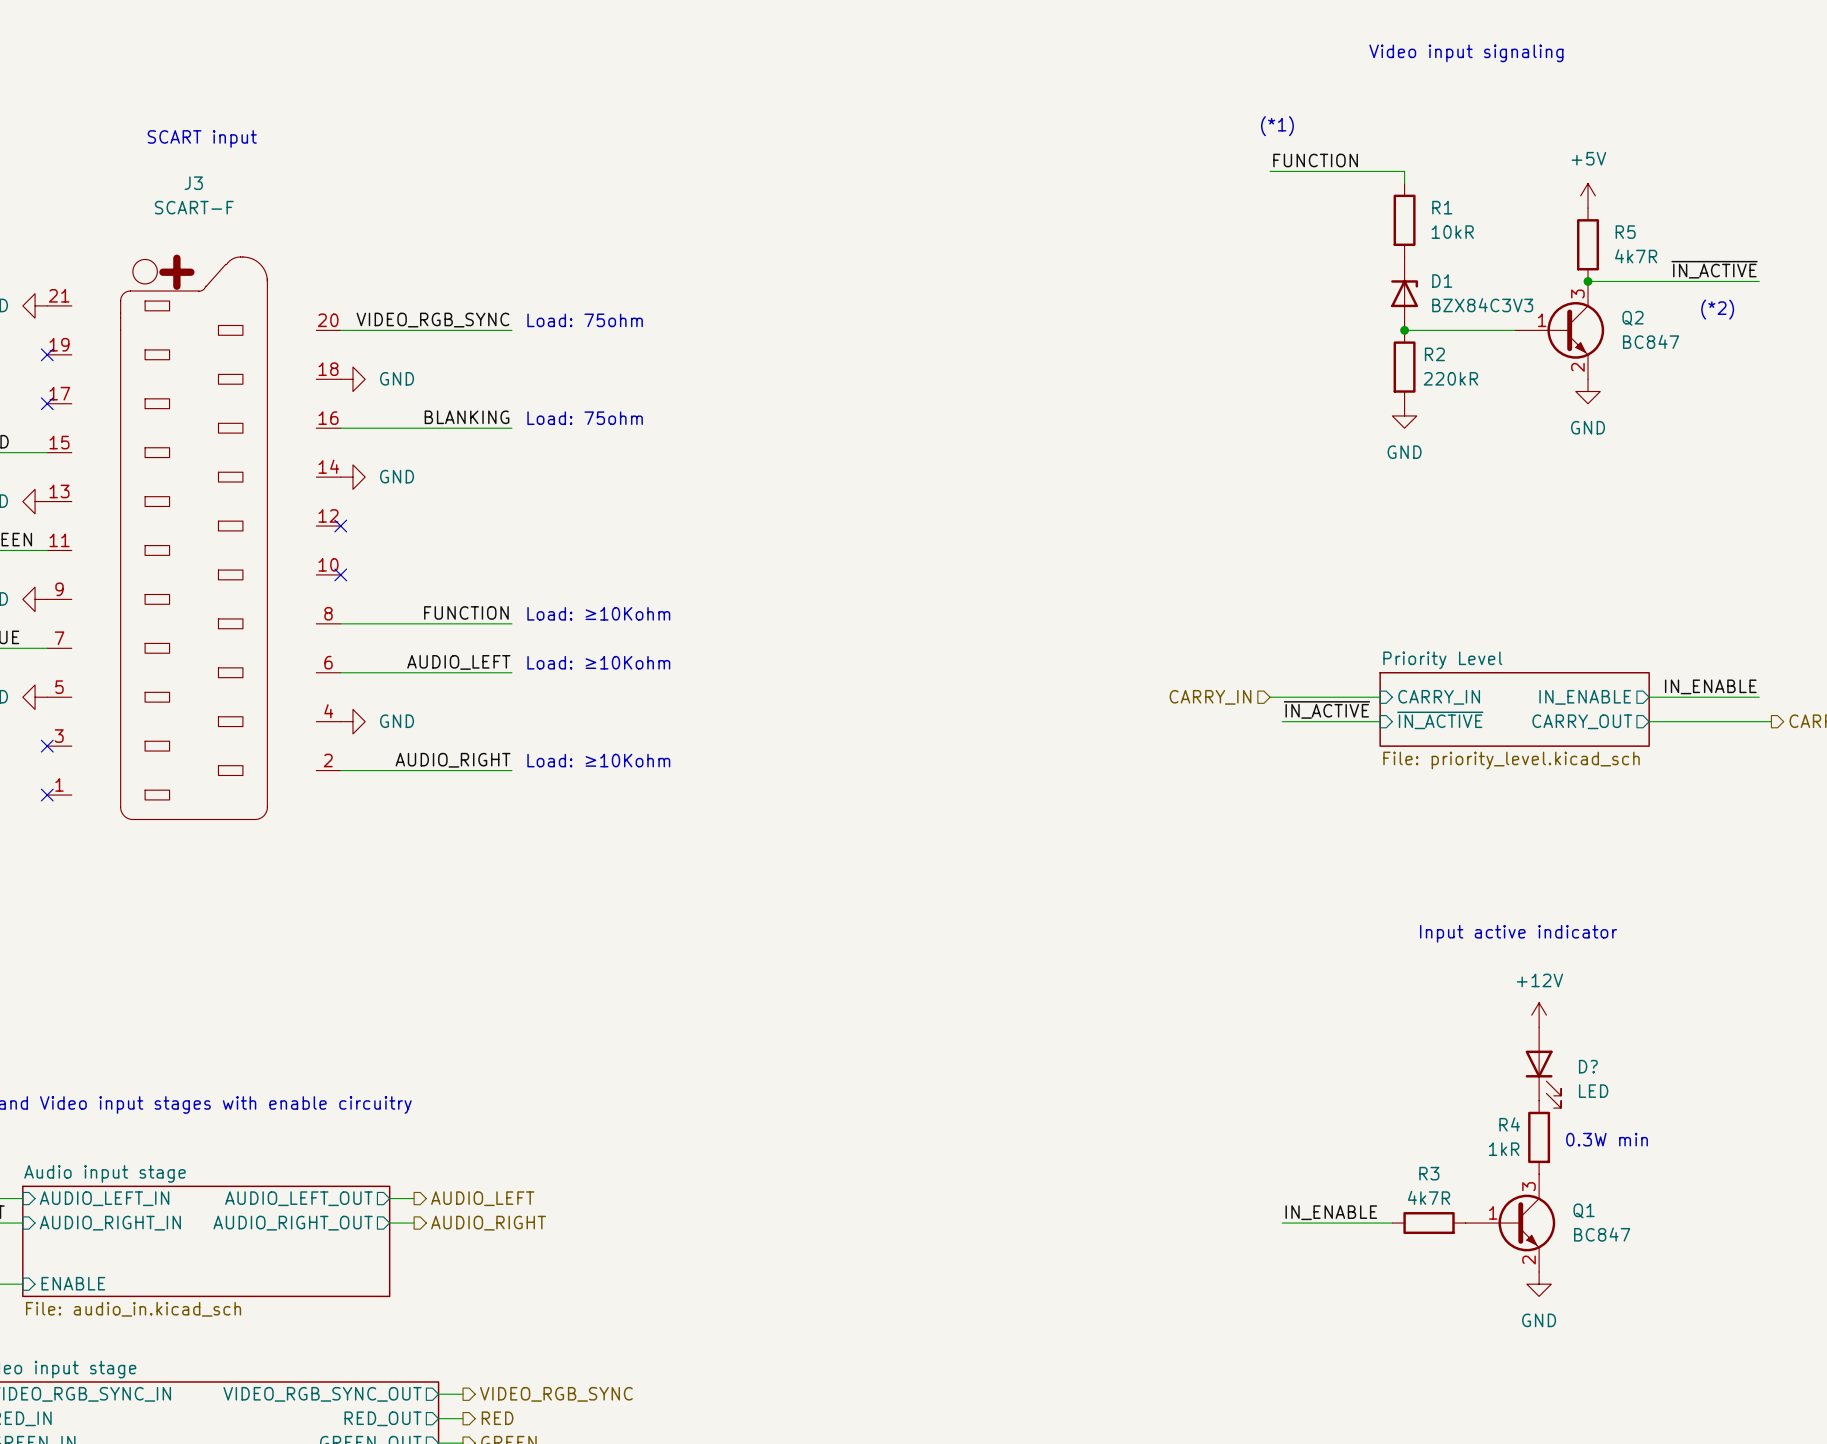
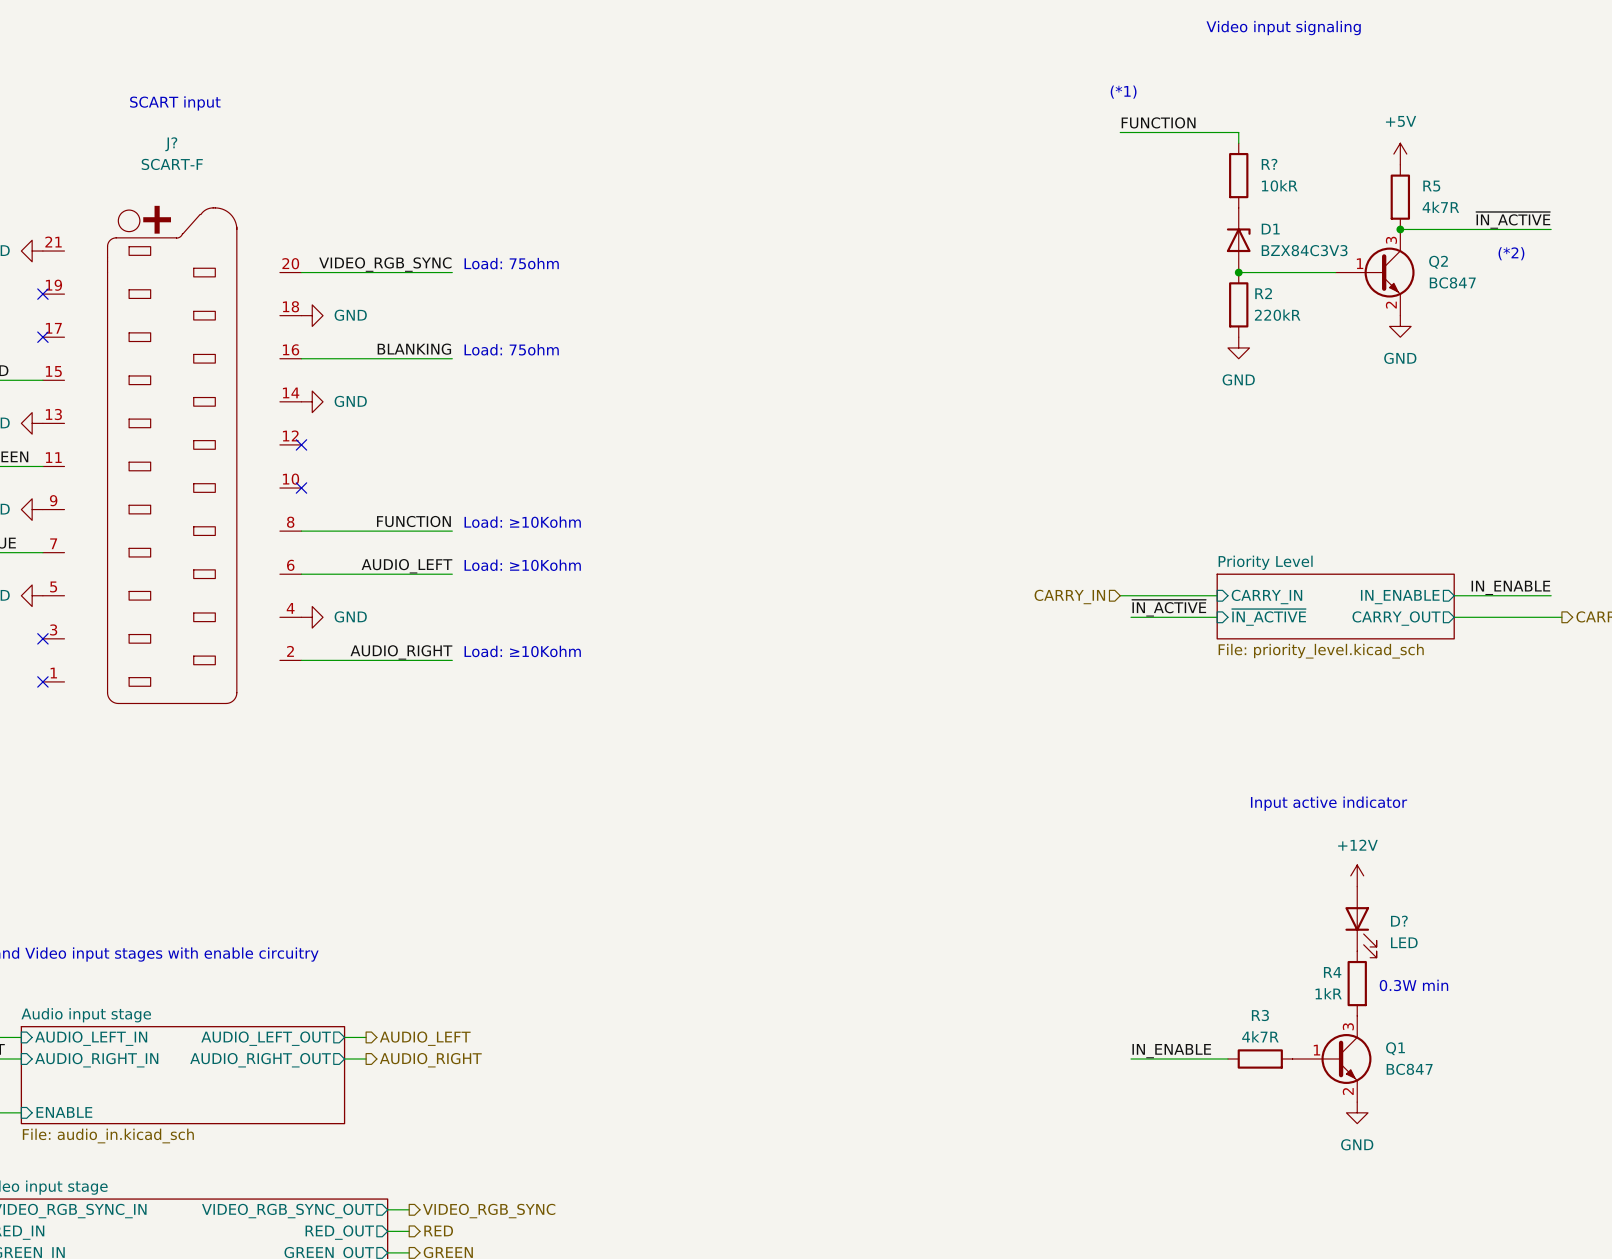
J3 name: J3 (193, 183) -> J? (171, 144)
R1 name: R1 (1442, 207) -> R? (1269, 164)

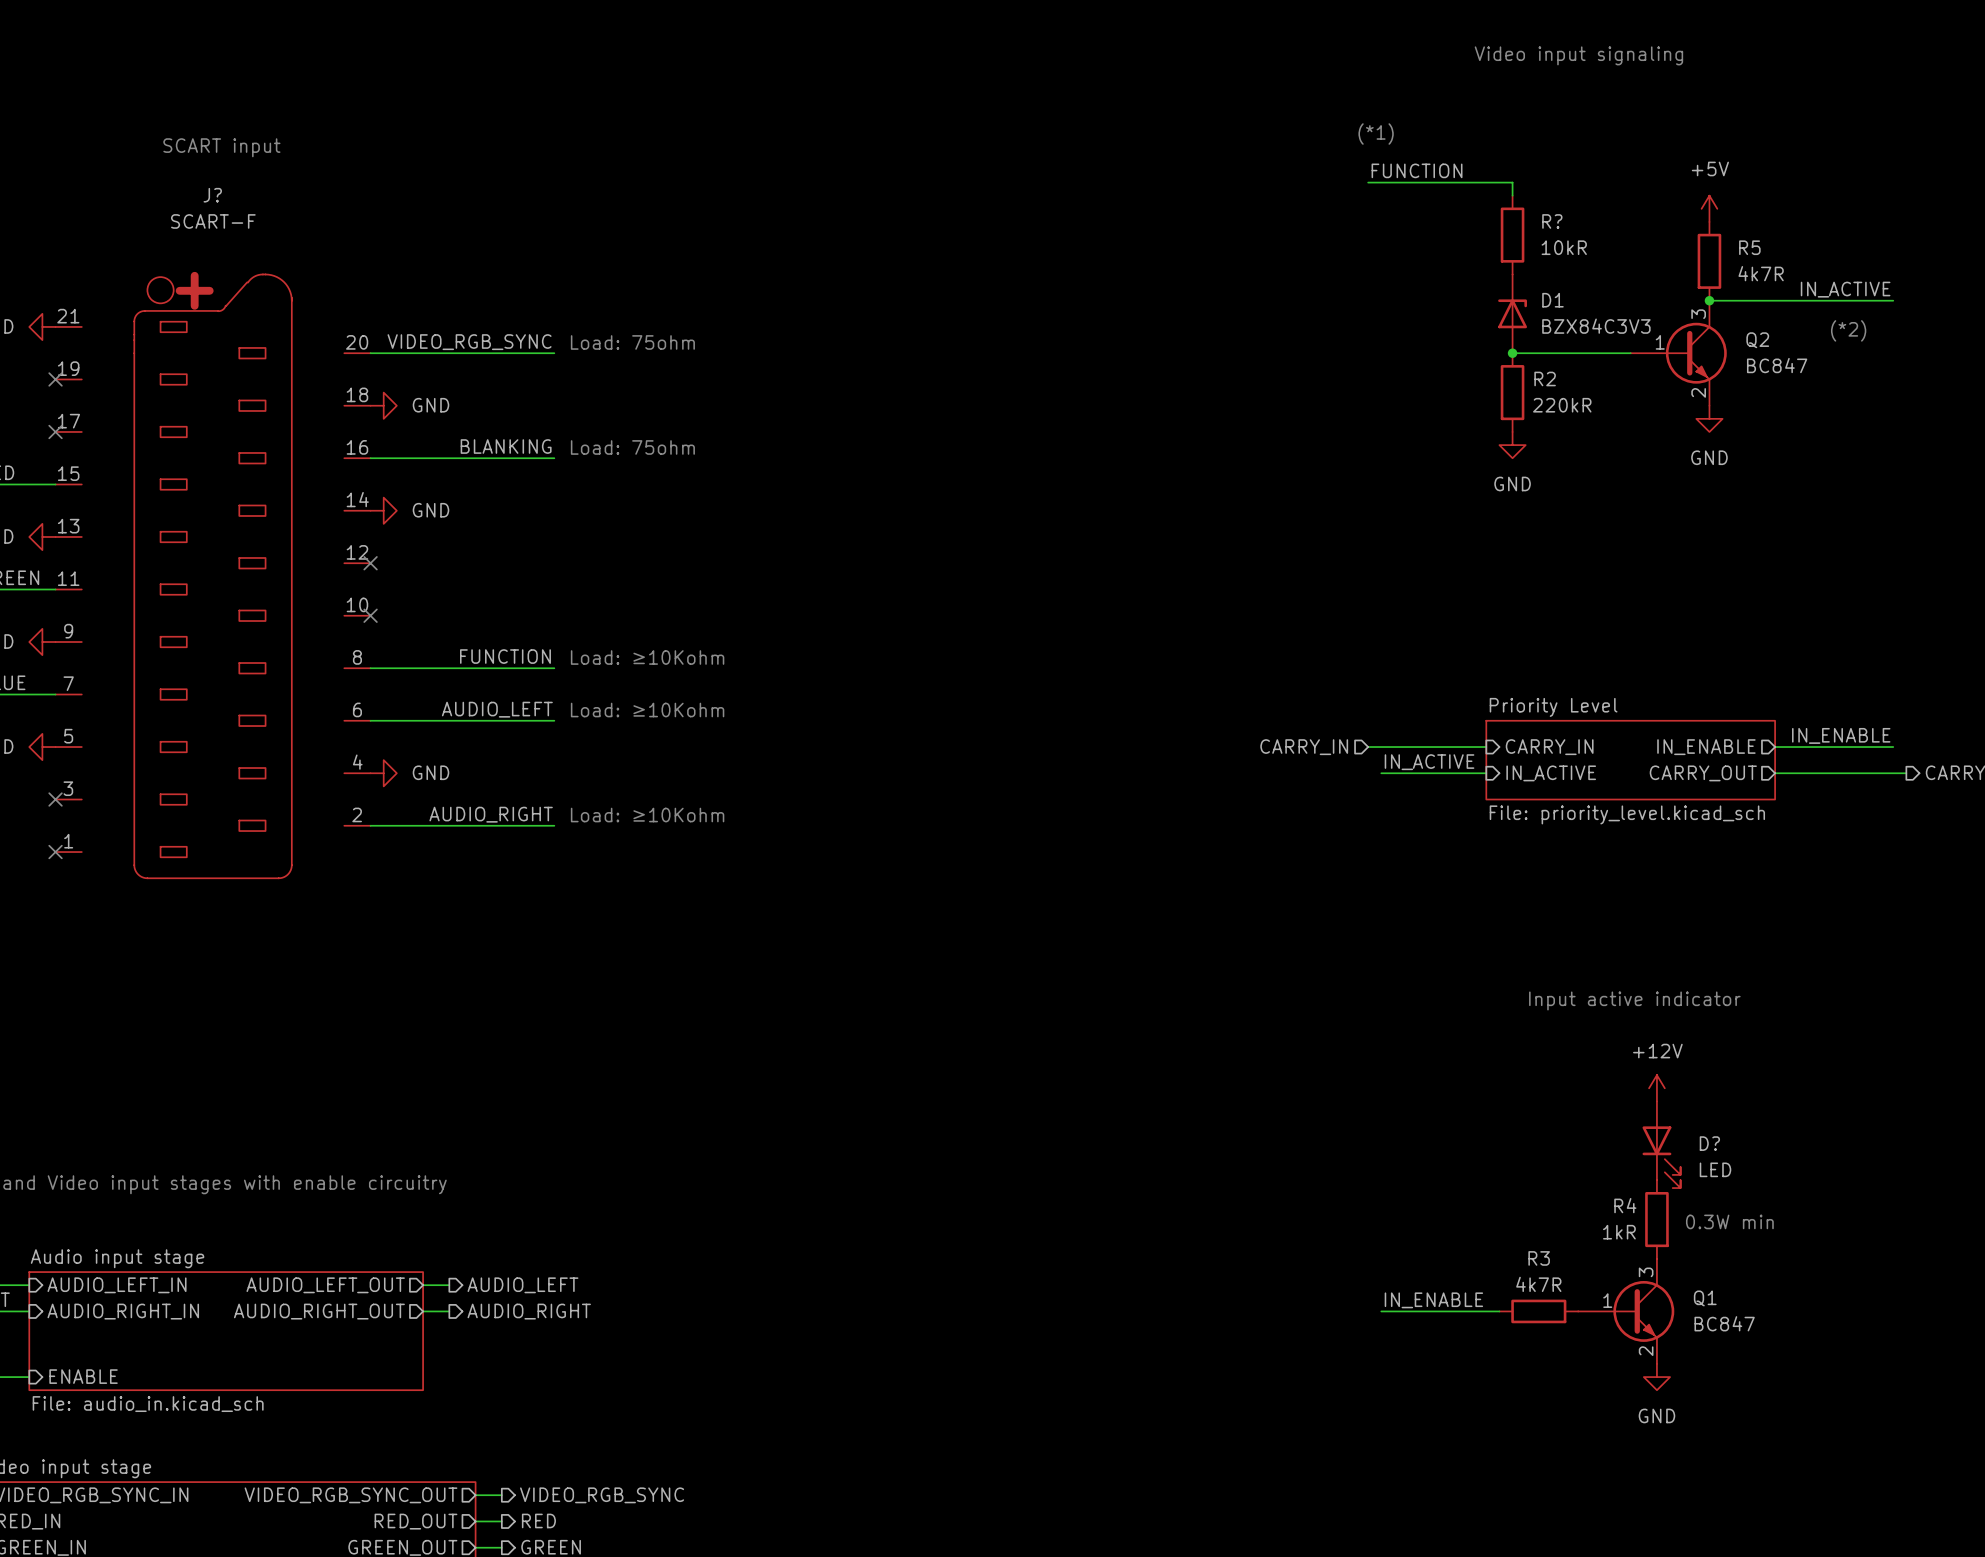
label: ~{IN_ACTIVE} (1513, 220) -> IN_ACTIVE (1845, 289)
label: ~{IN_ACTIVE} (1169, 608) -> IN_ACTIVE (1429, 762)
sheet pin: ~{IN_ACTIVE} (1268, 617) -> IN_ACTIVE (1551, 773)

